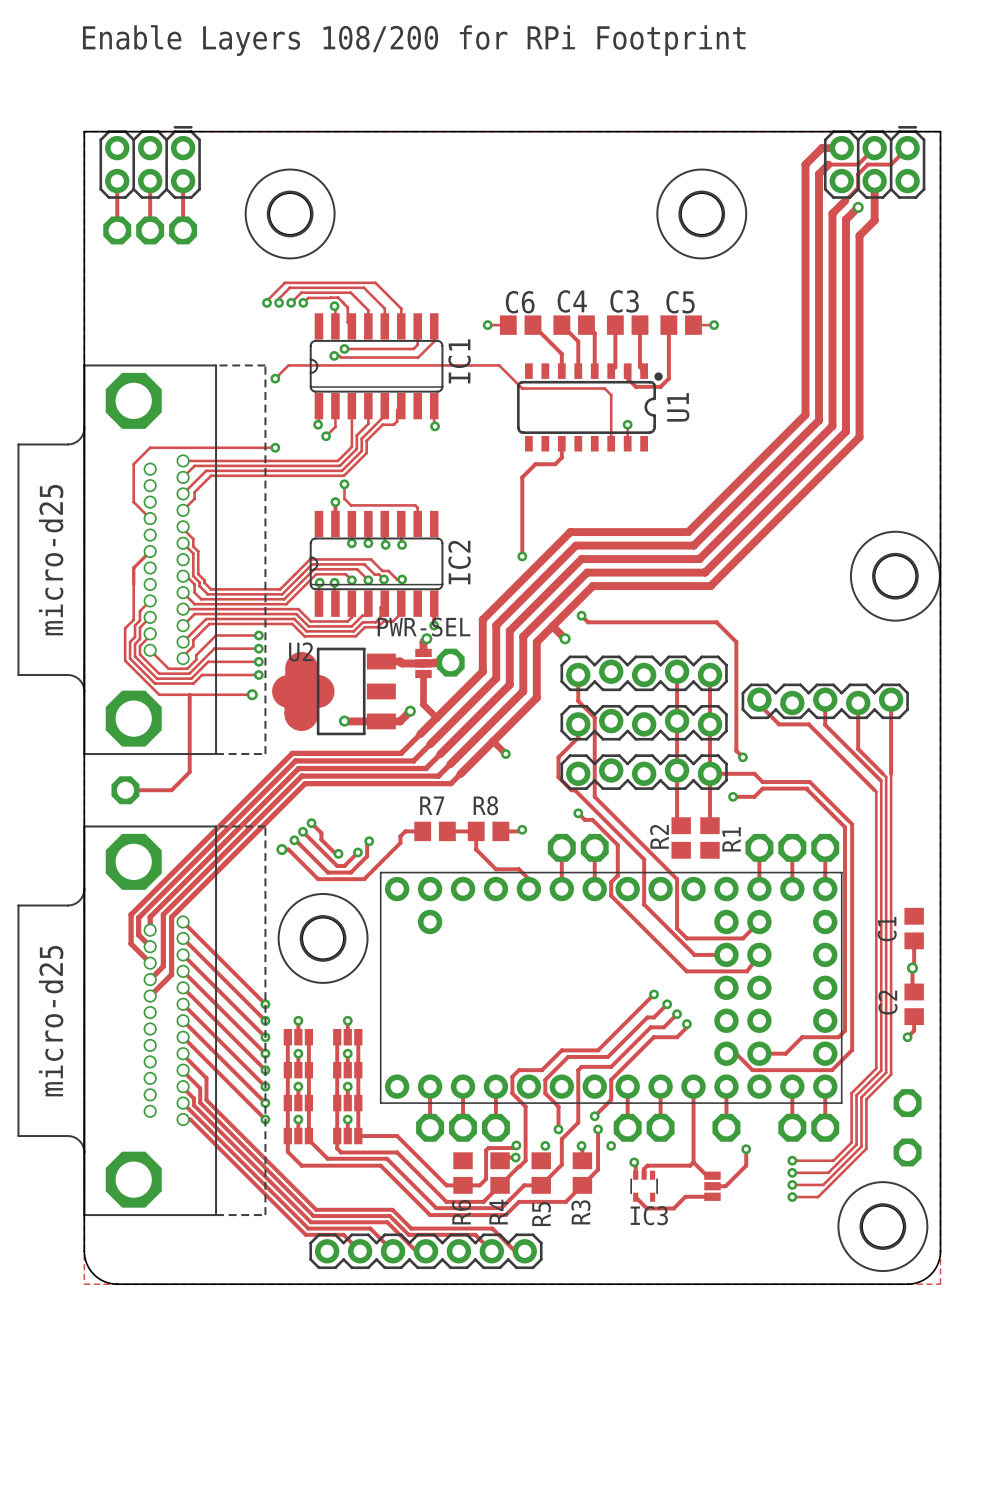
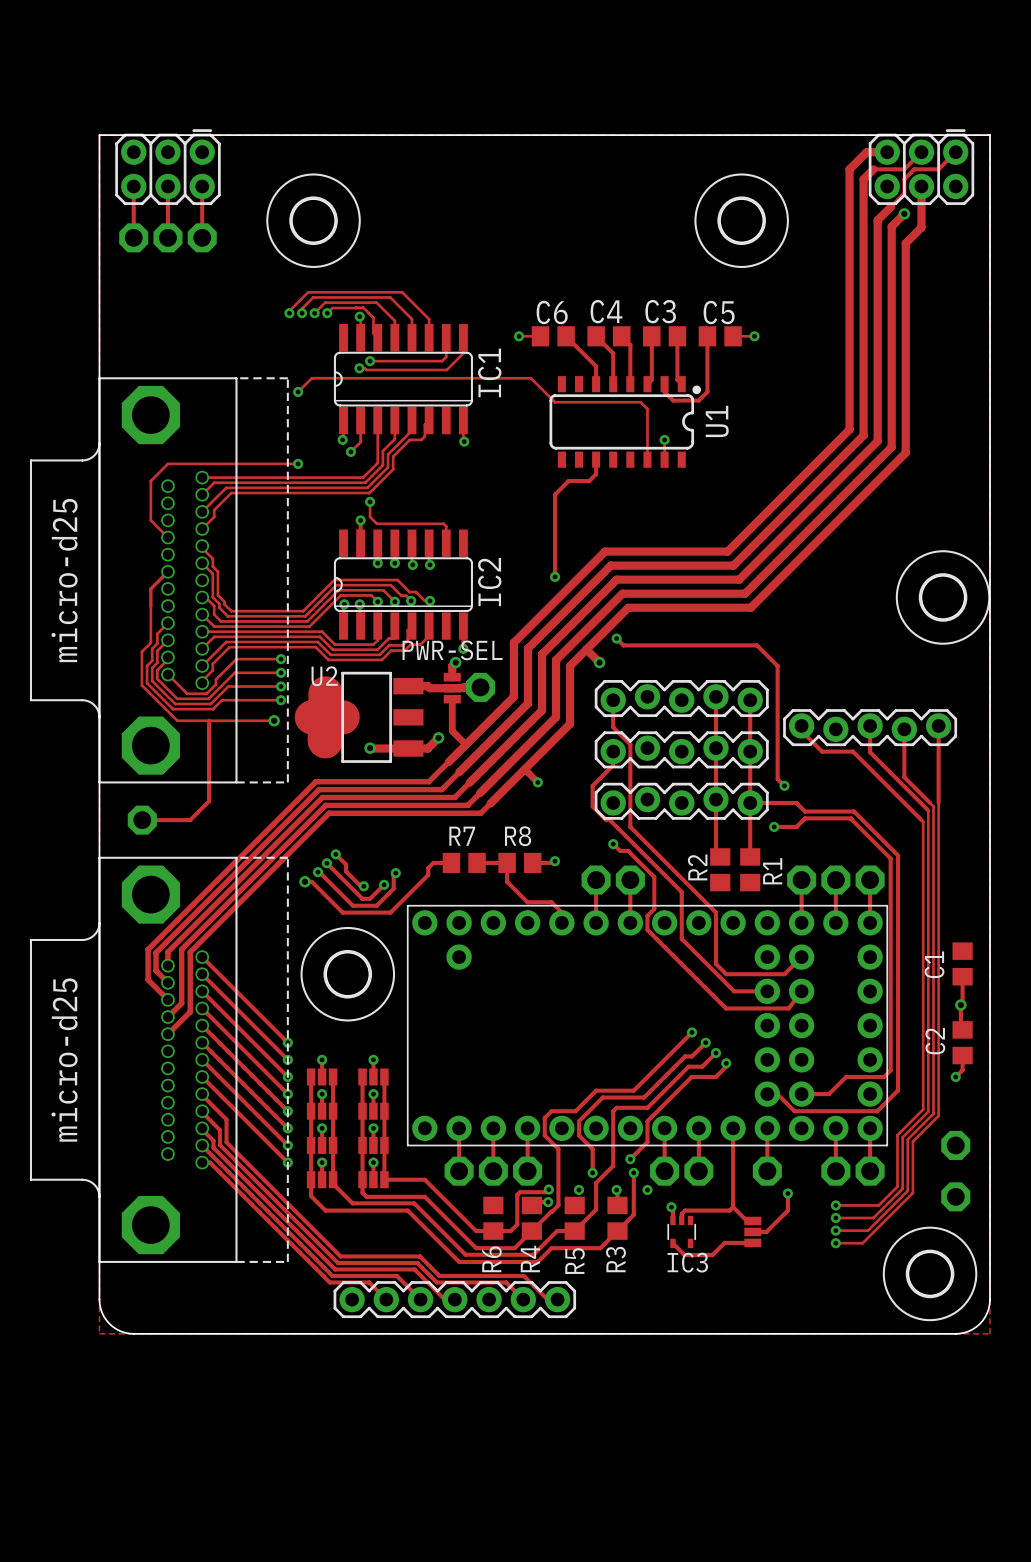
text: Enable Layers 108/200 for RPi Footprint (414, 40) -> none

